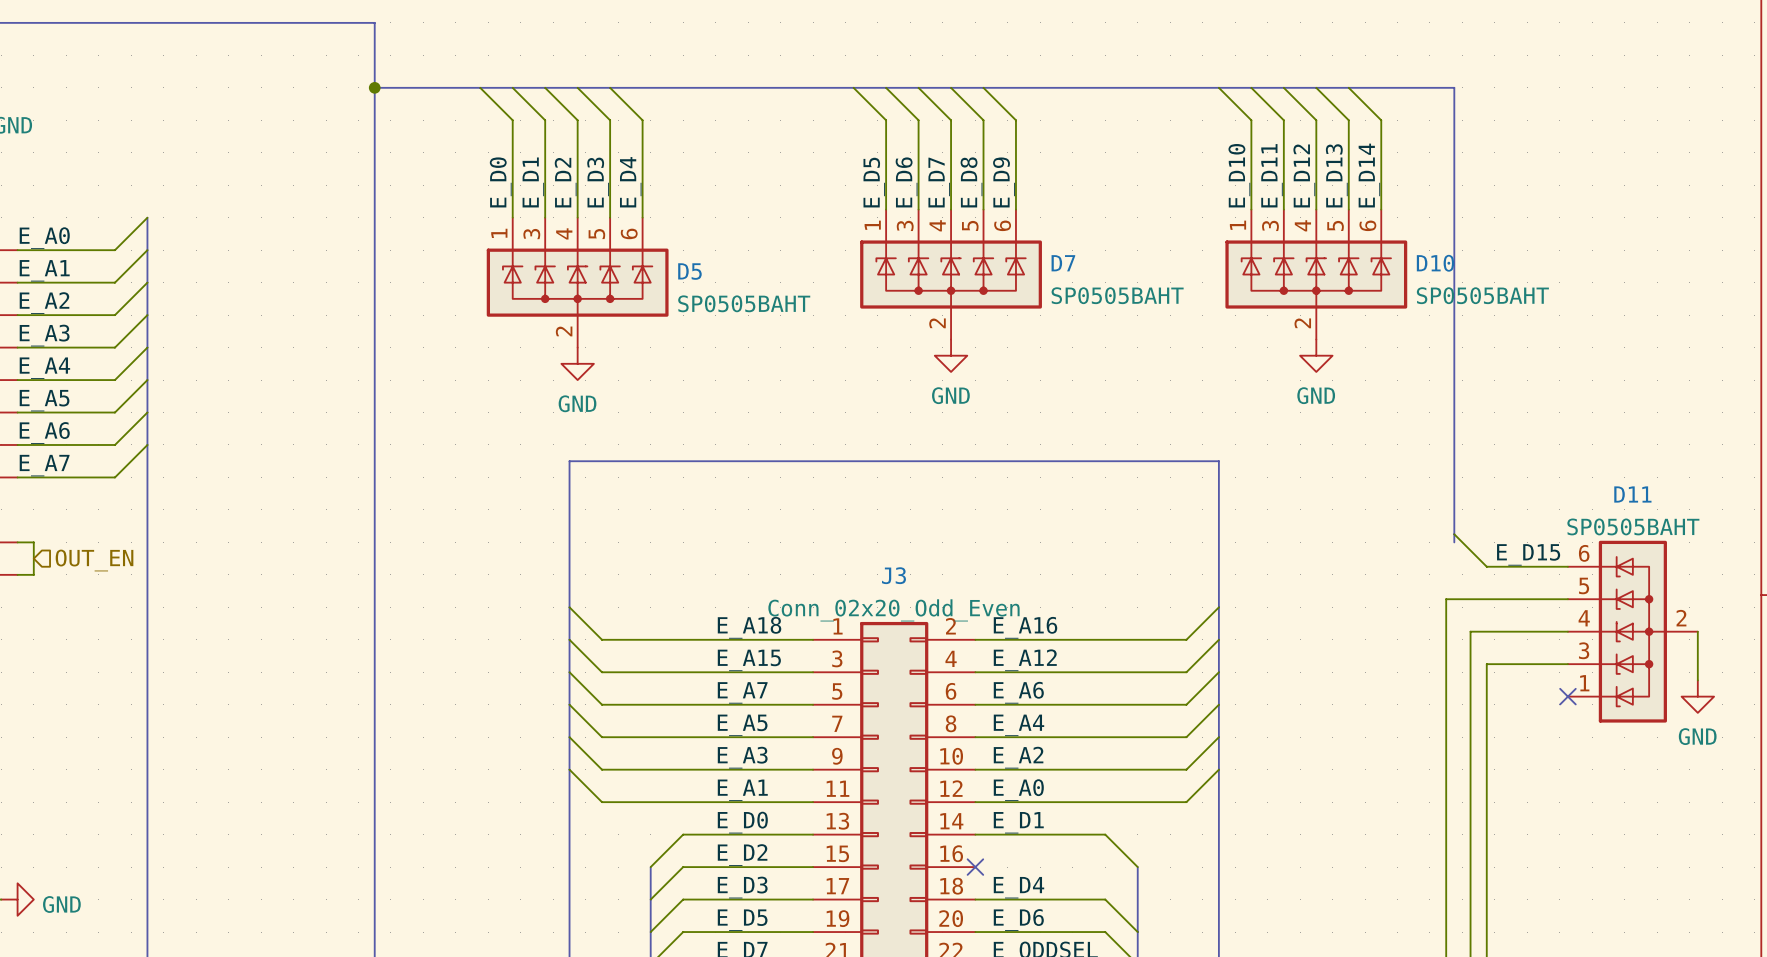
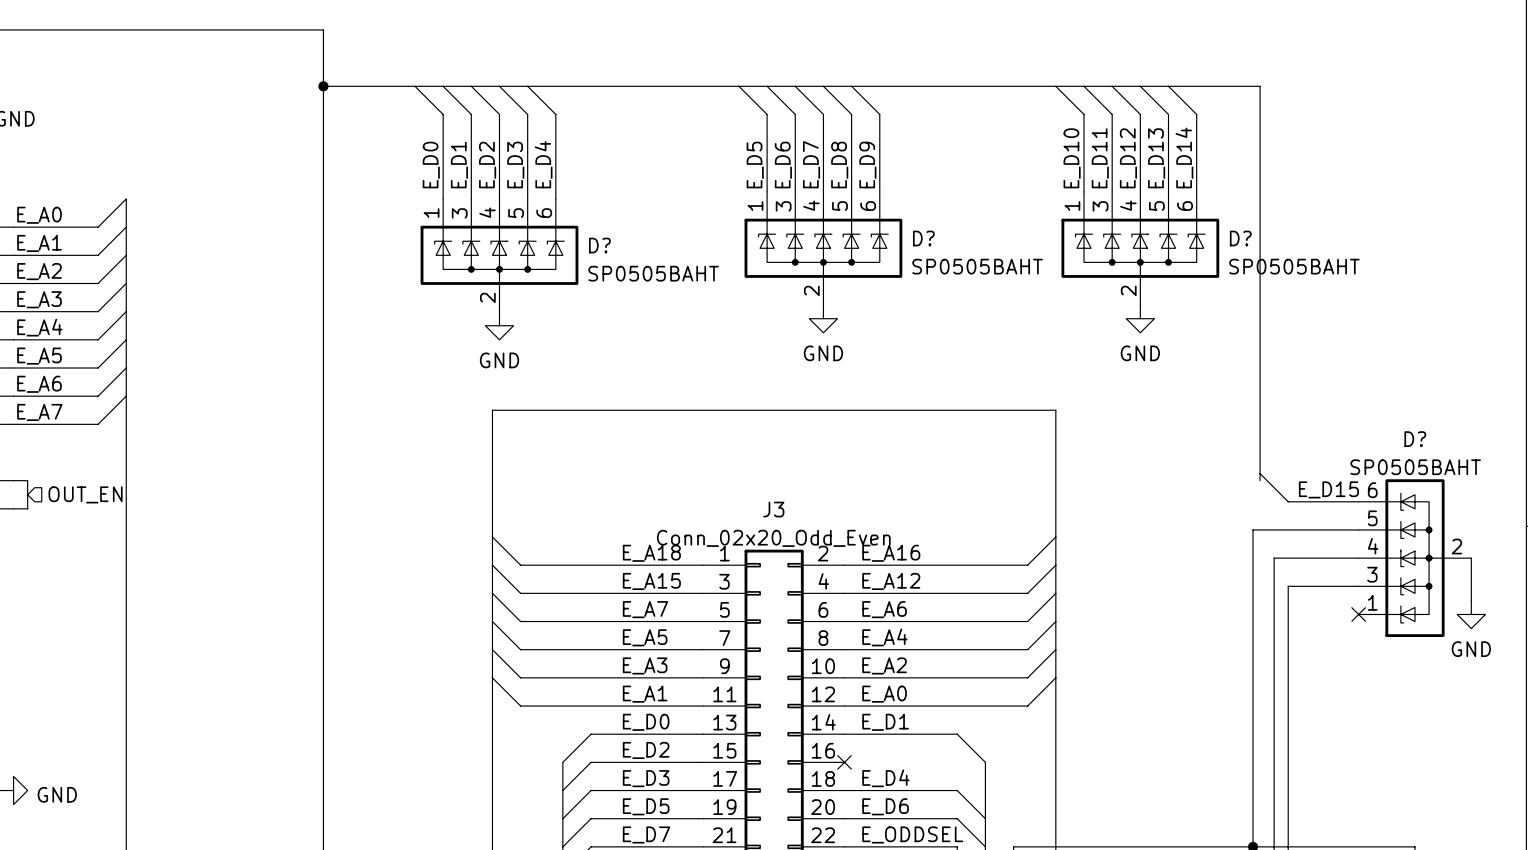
D7 name: D7 (1063, 263) -> D? (923, 238)
D10 name: D10 (1435, 263) -> D? (1240, 238)
D5 name: D5 (689, 271) -> D? (599, 245)
D11 name: D11 (1632, 494) -> D? (1415, 439)

